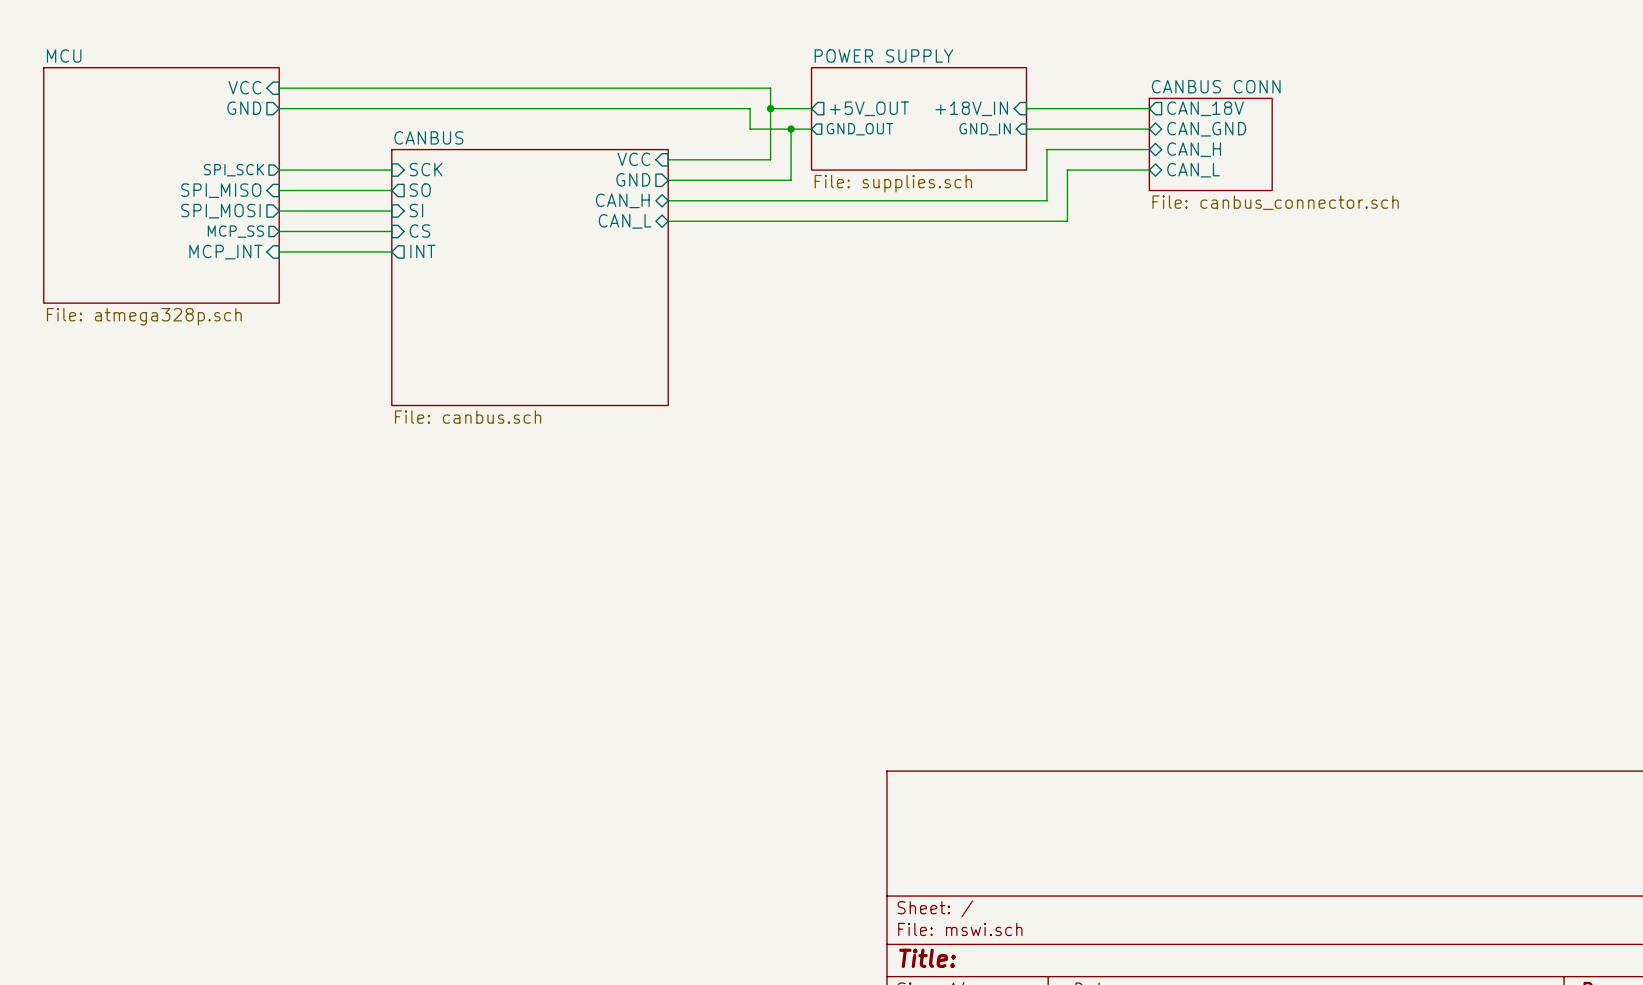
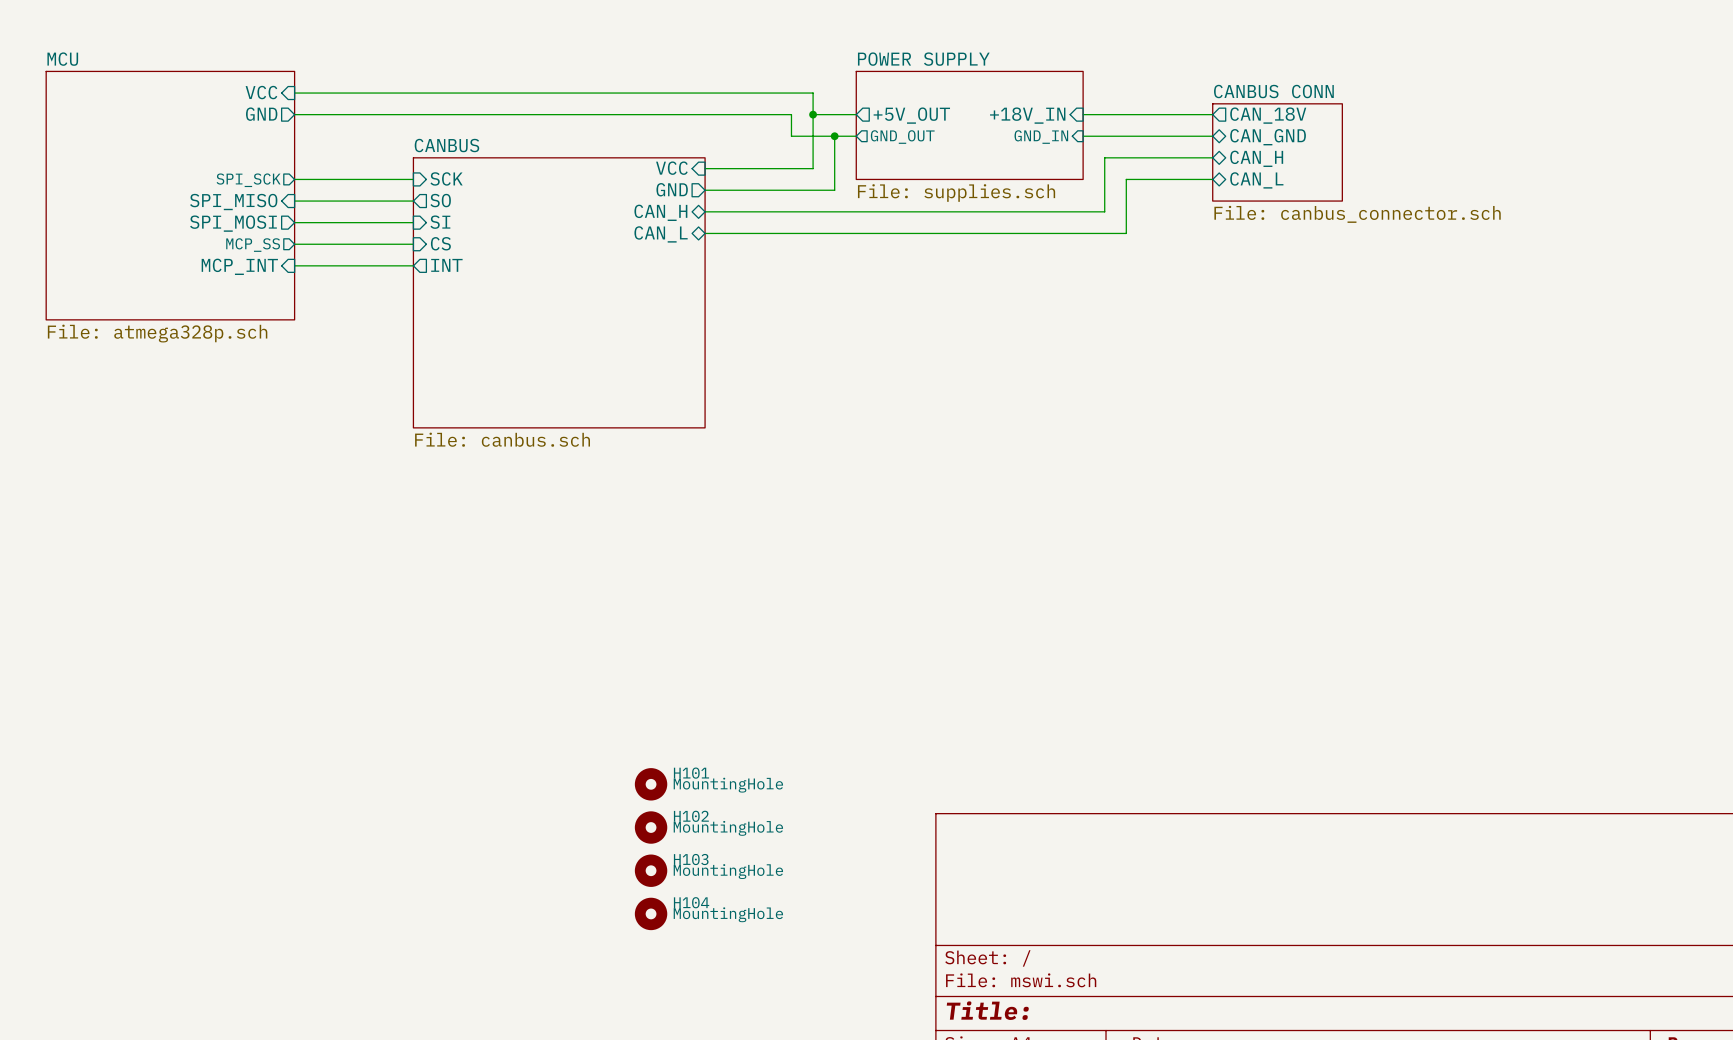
H101: none -> MountingHole (651, 784)
H102: none -> MountingHole (651, 827)
H103: none -> MountingHole (651, 870)
H104: none -> MountingHole (651, 913)

